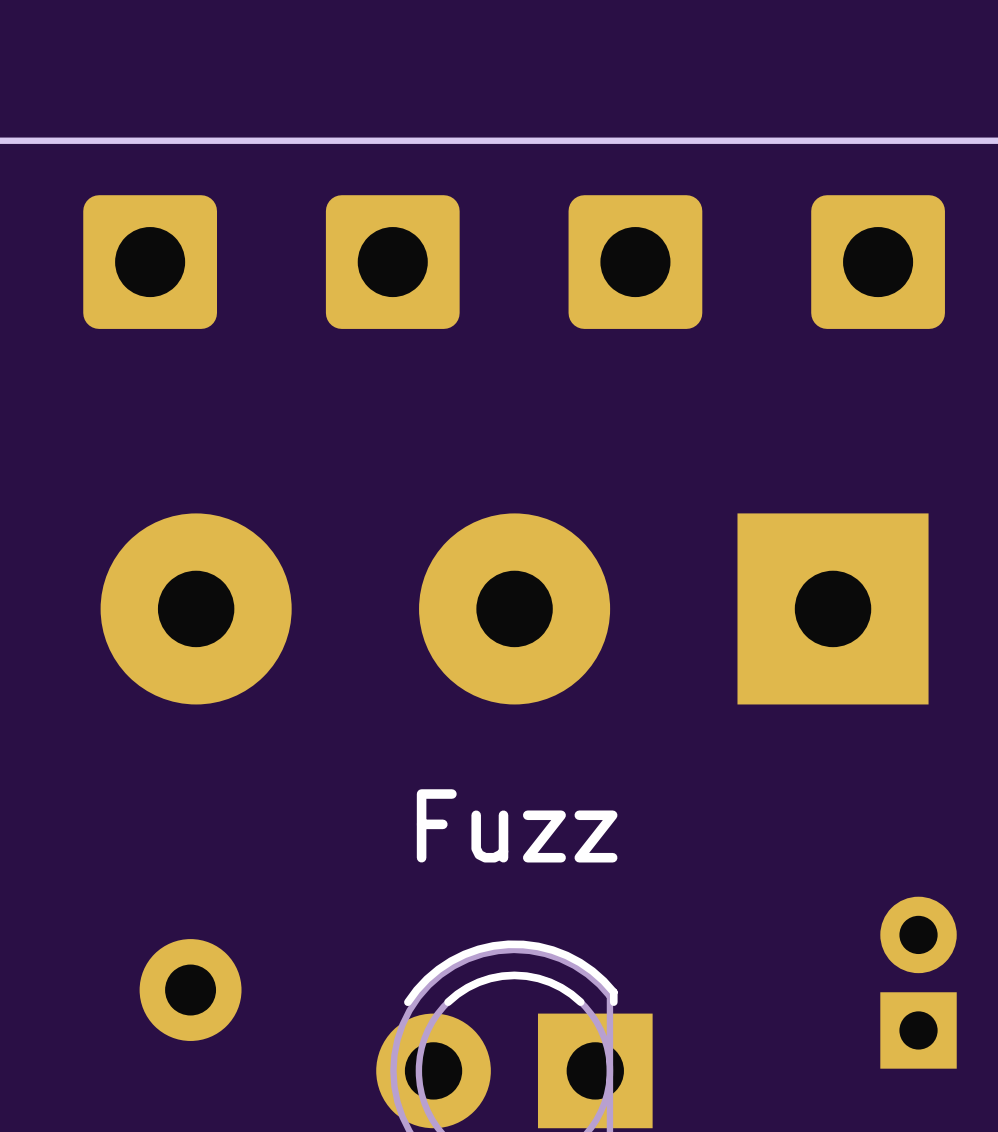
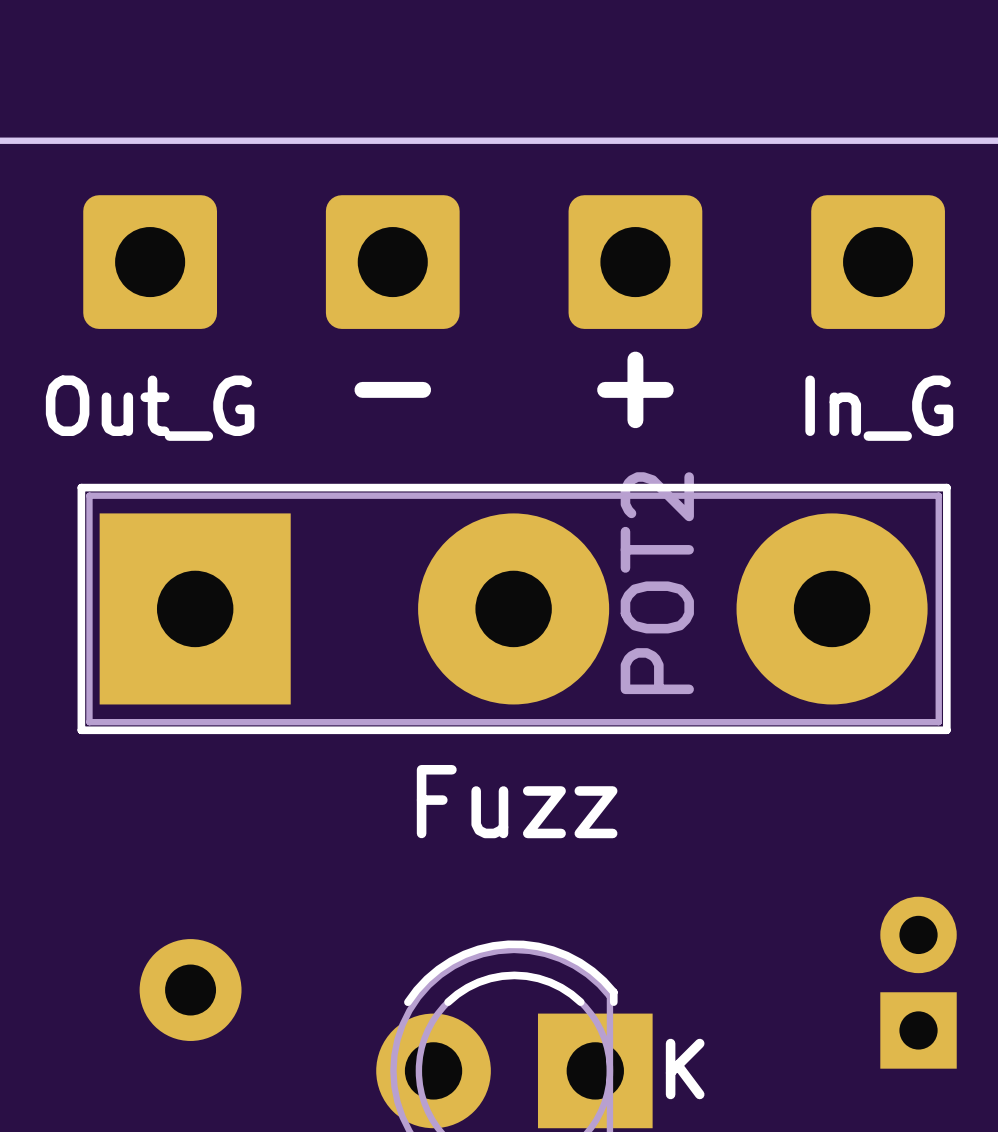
part value: none -> - (392, 389)
part value: none -> + (635, 389)
part value: none -> Out_G (150, 408)
part value: none -> In_G (879, 408)
POT2 side: top (514, 608) -> bottom (514, 608)
part text: none -> K (685, 1069)

